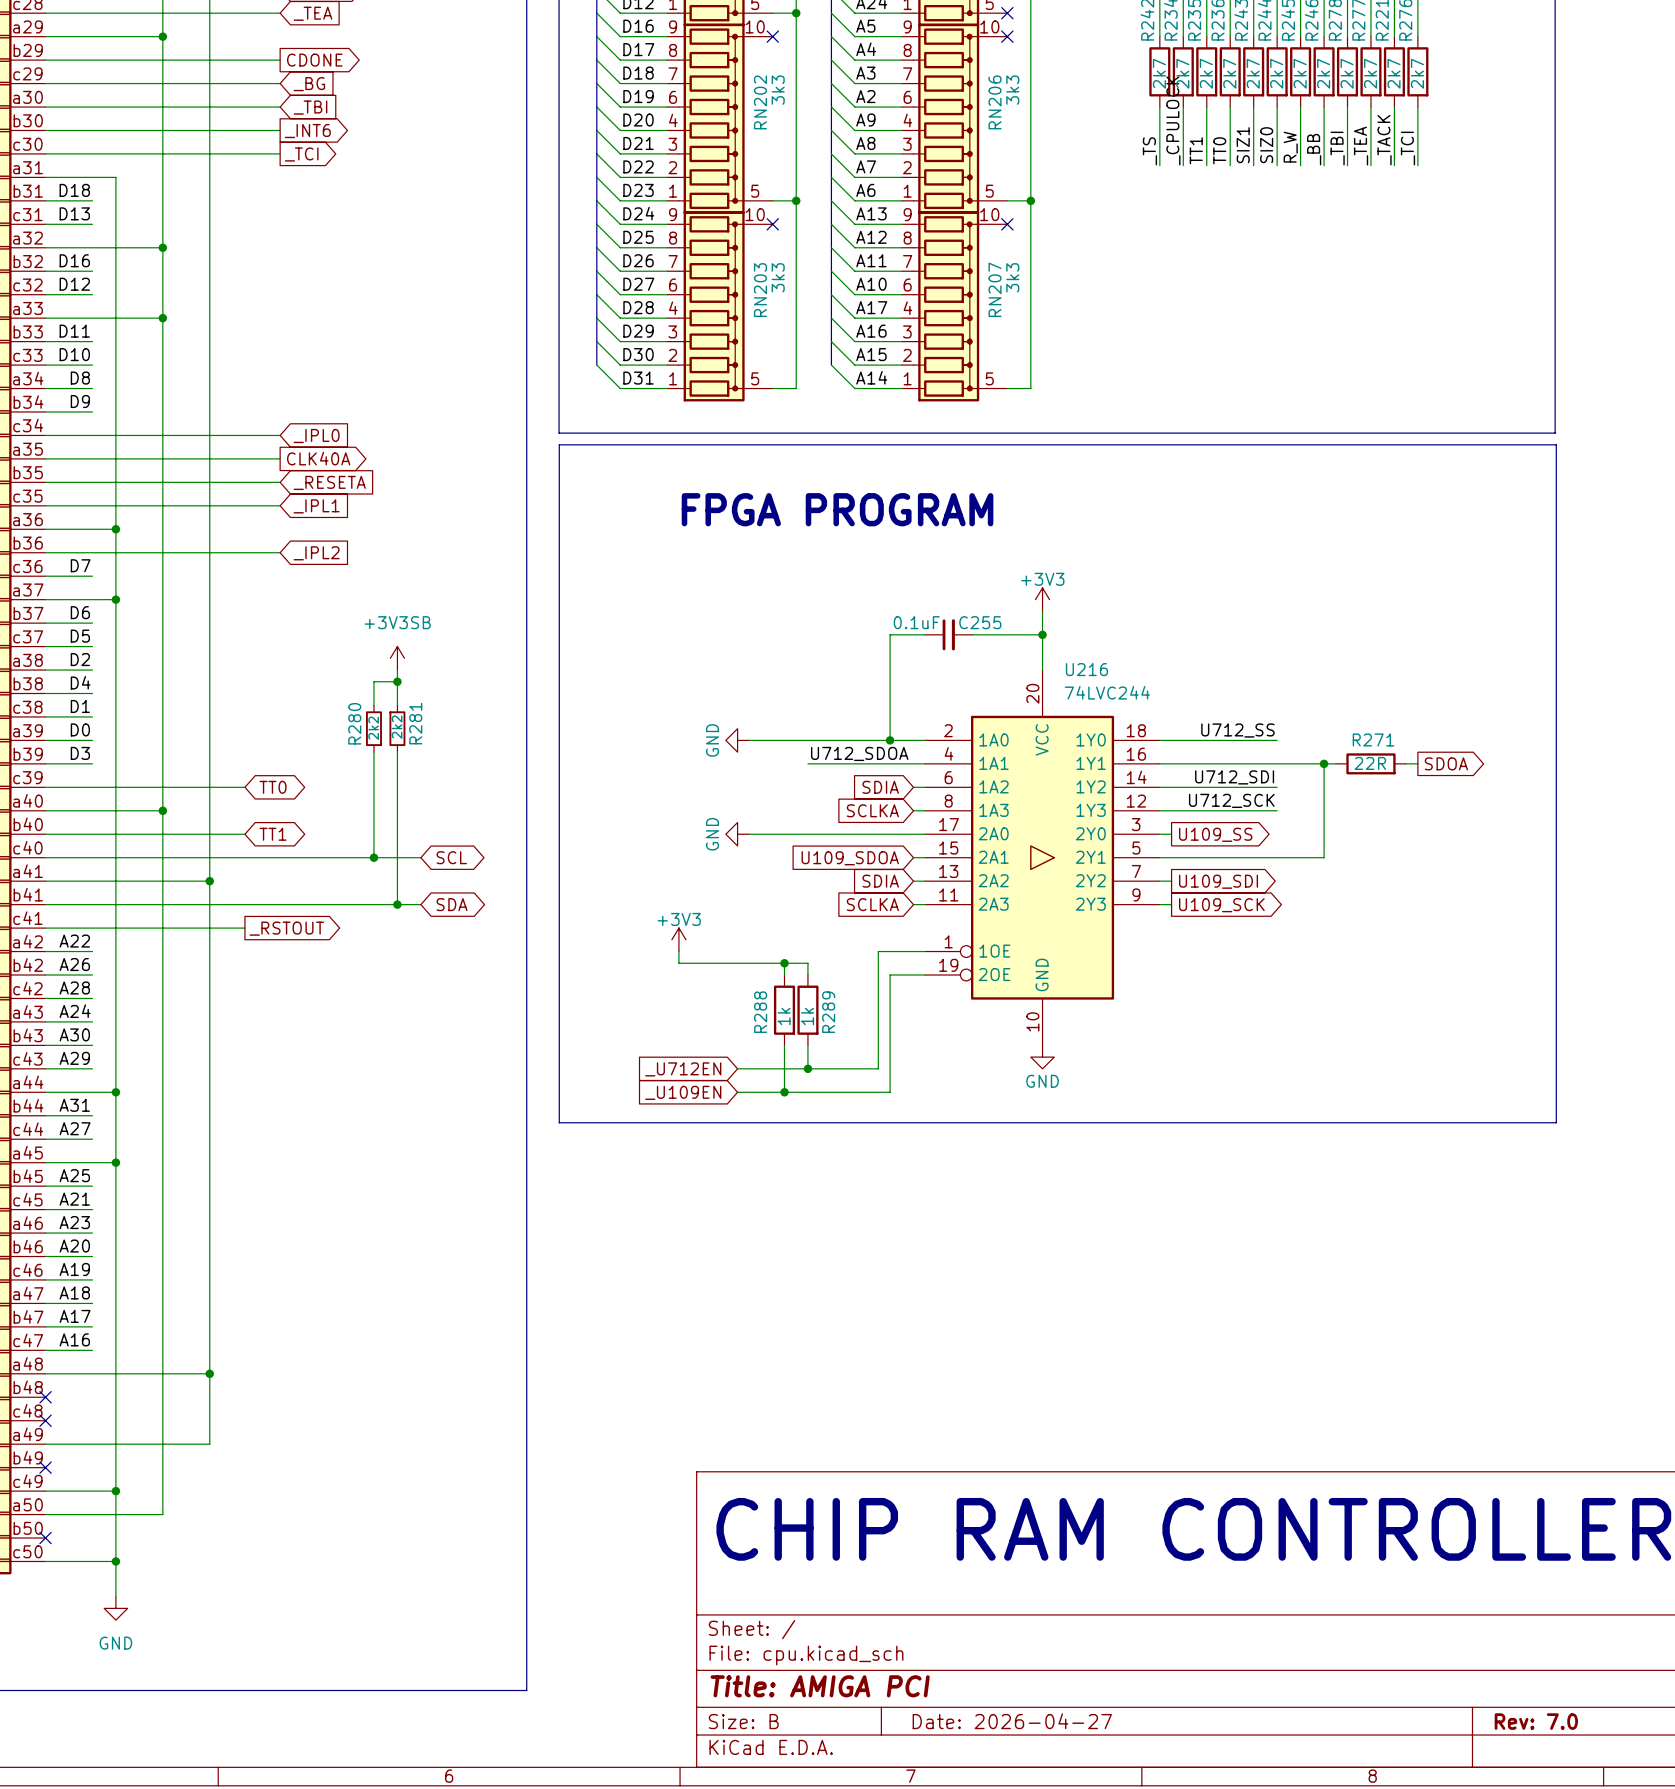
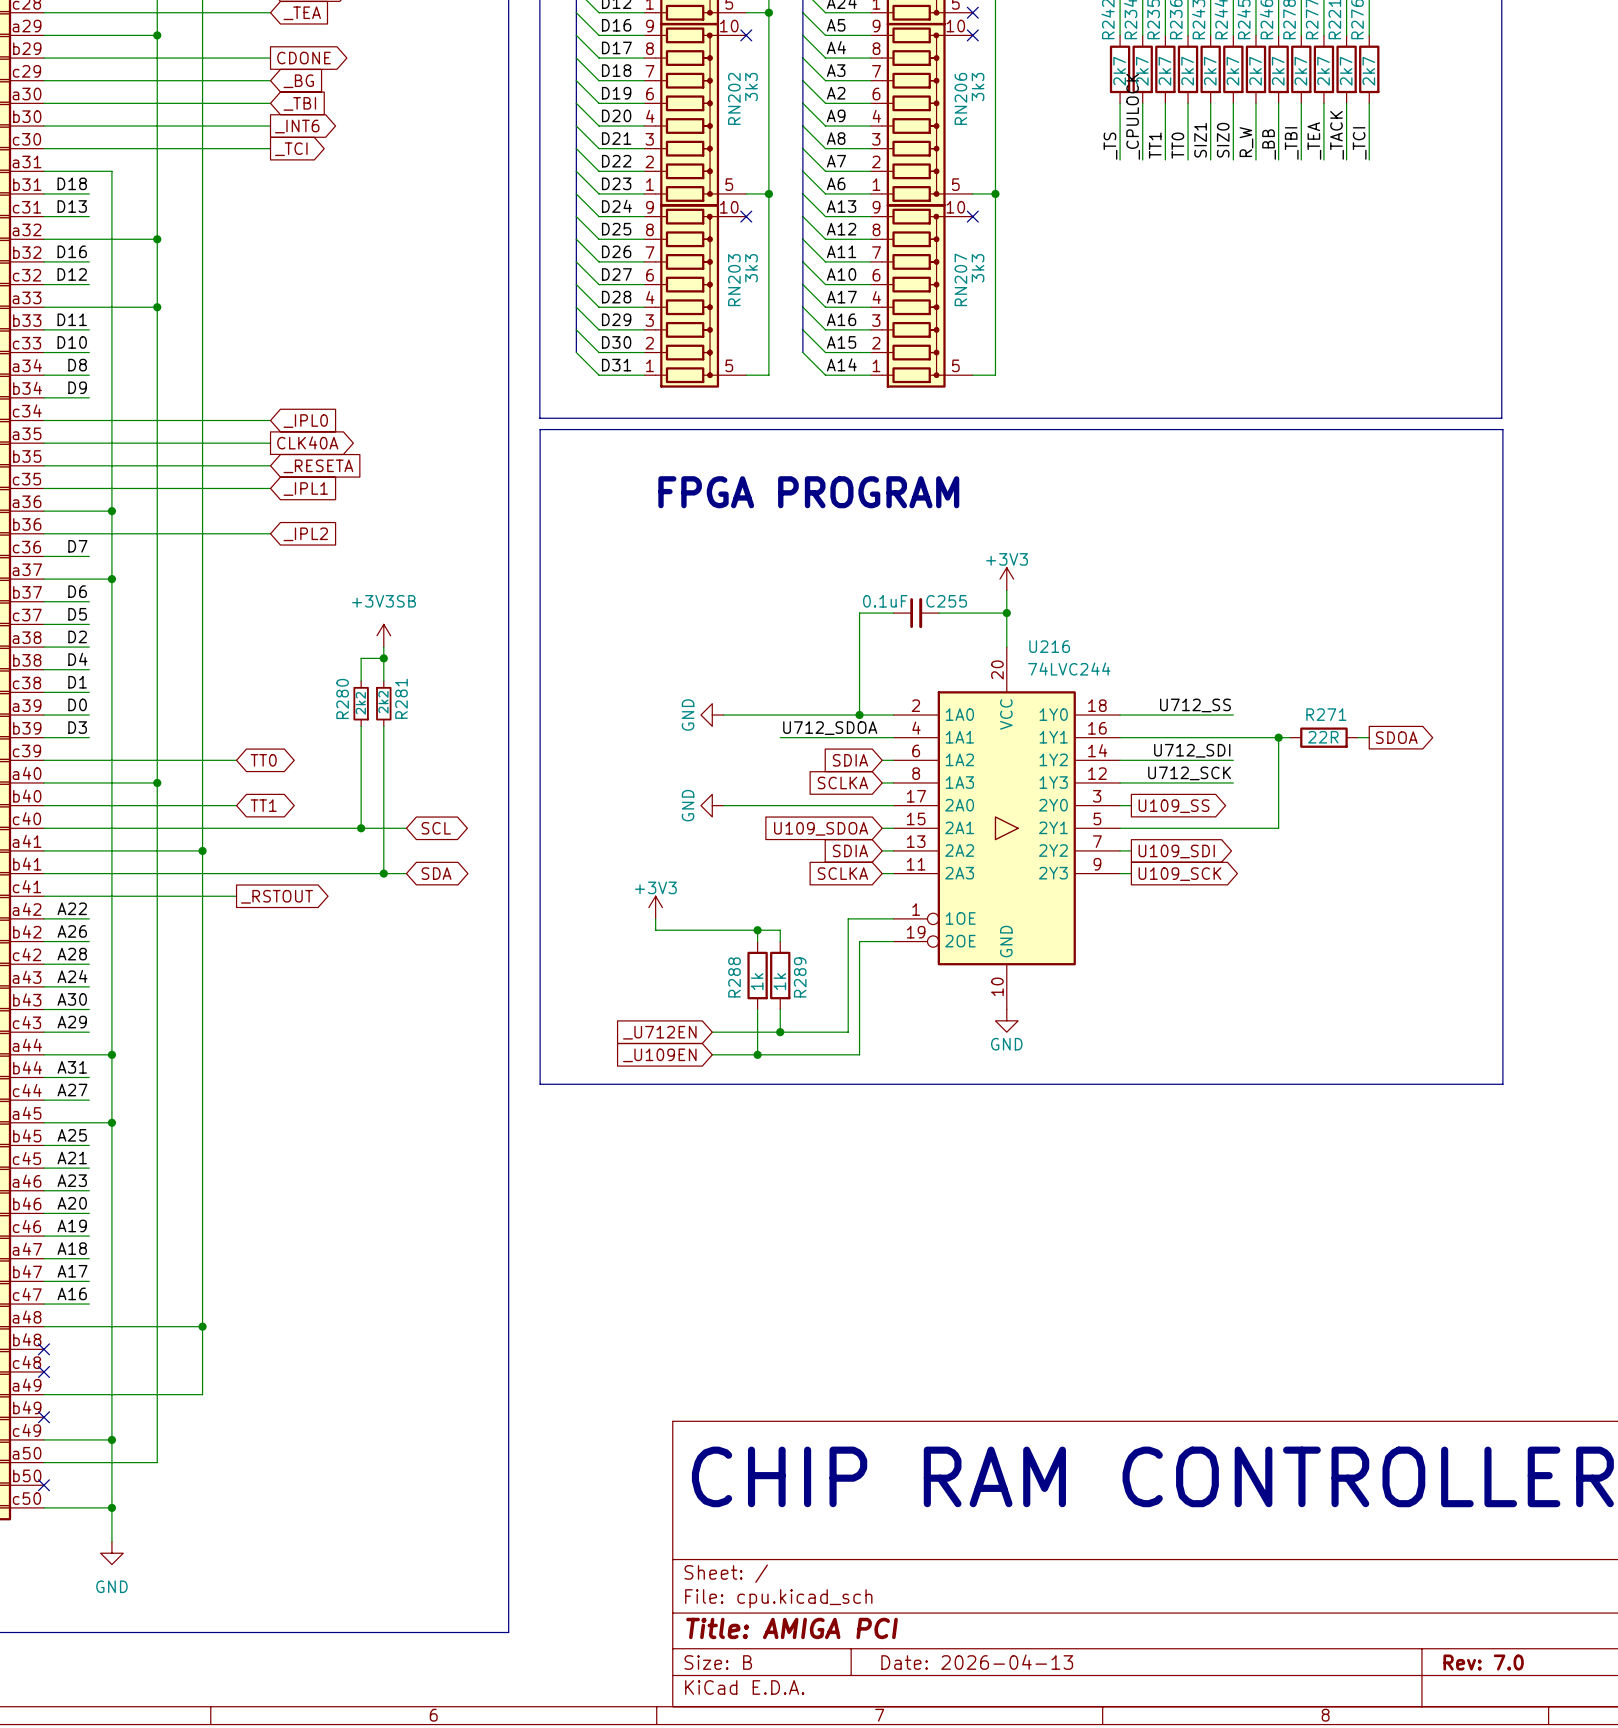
title block: Date: 2026-04-27 (1012, 1721) -> Date: 2026-04-13 (977, 1662)

